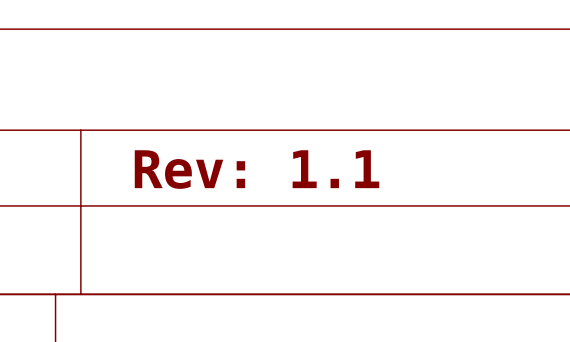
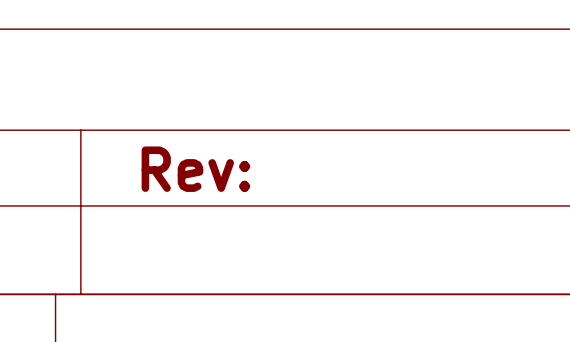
title block: Rev: 1.1 (257, 169) -> Rev: (195, 169)

